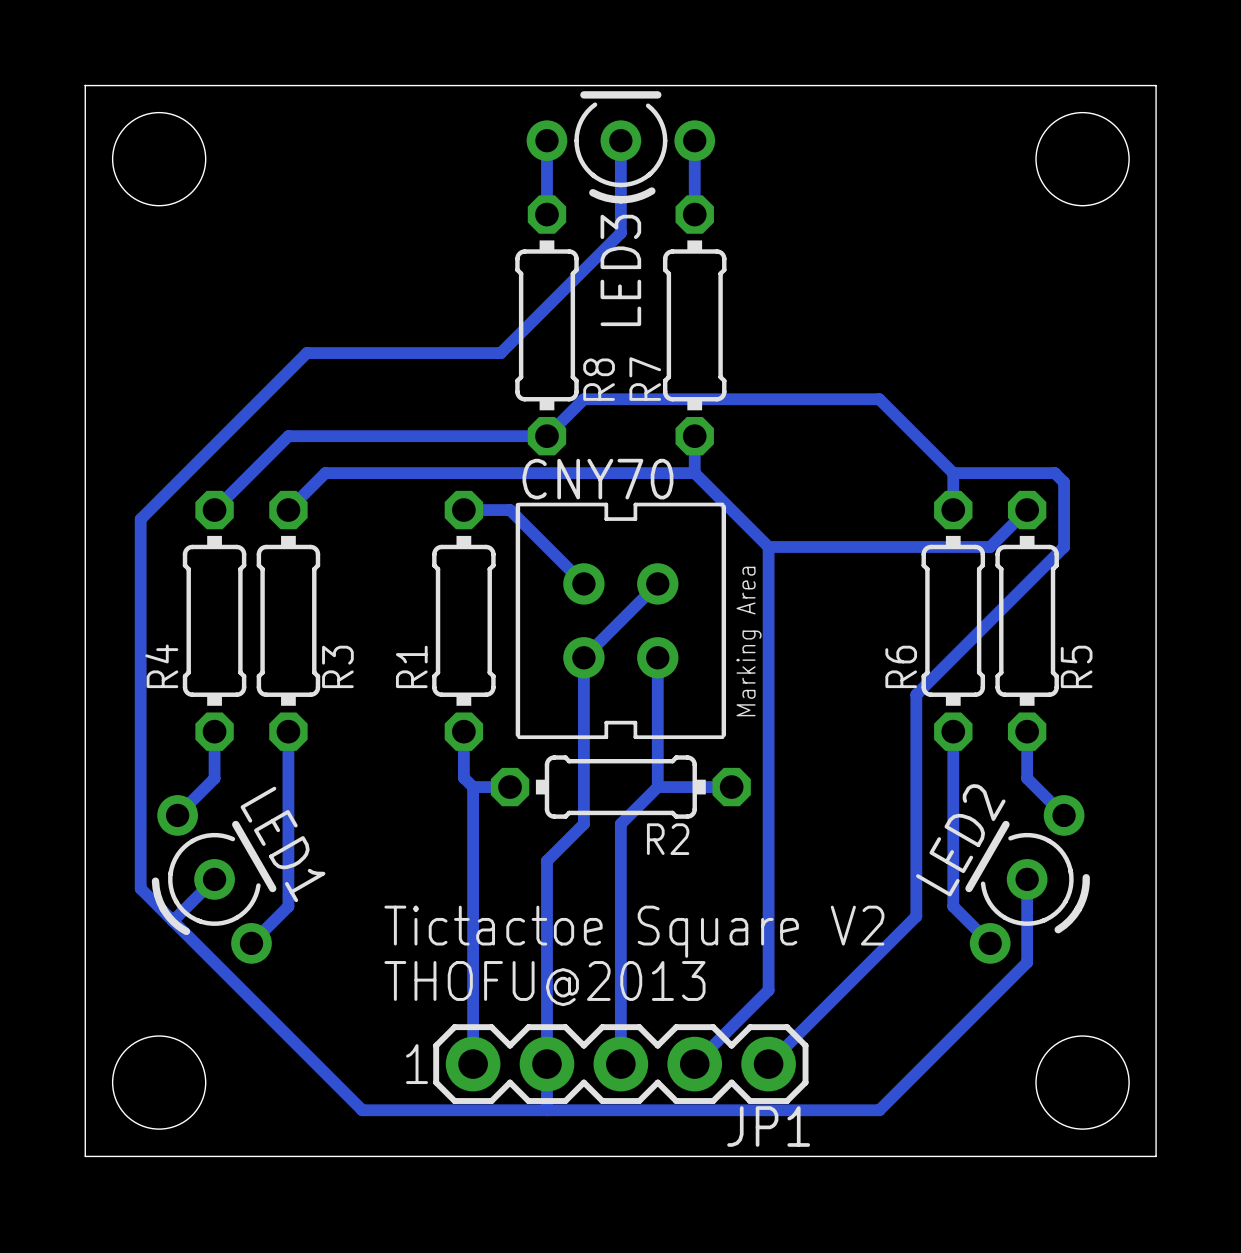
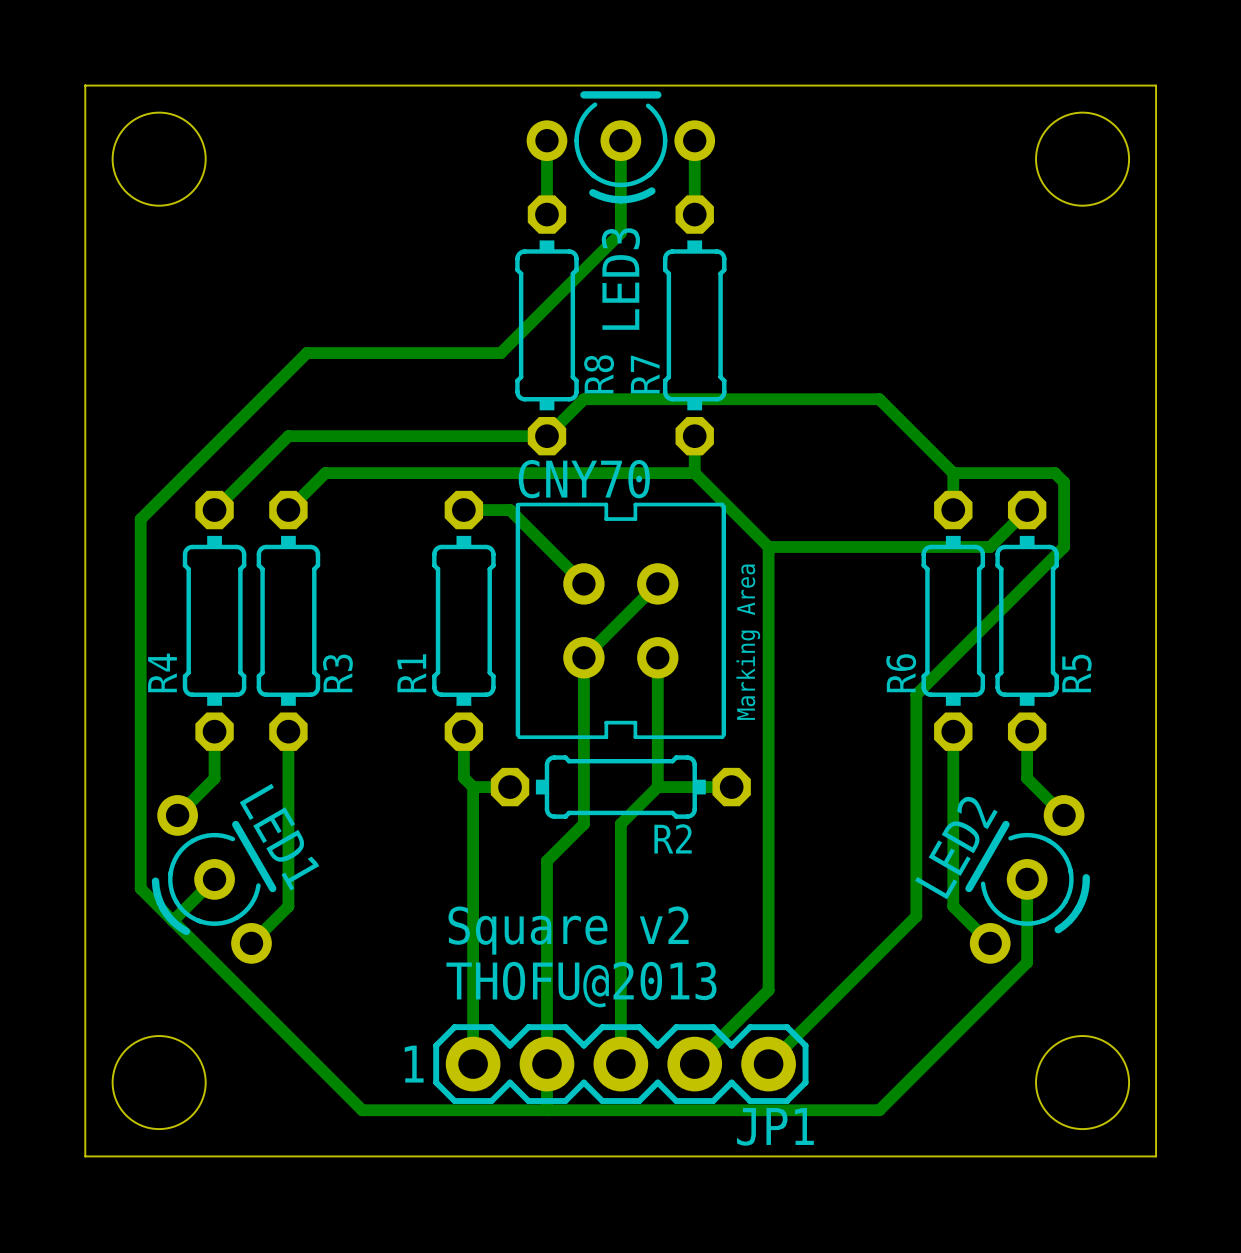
text: none -> Square v2 (568, 930)
text: Tictactoe Square V2 (634, 931) -> none
text position: THOFU@2013 (544, 983) -> THOFU@2013 (581, 984)

